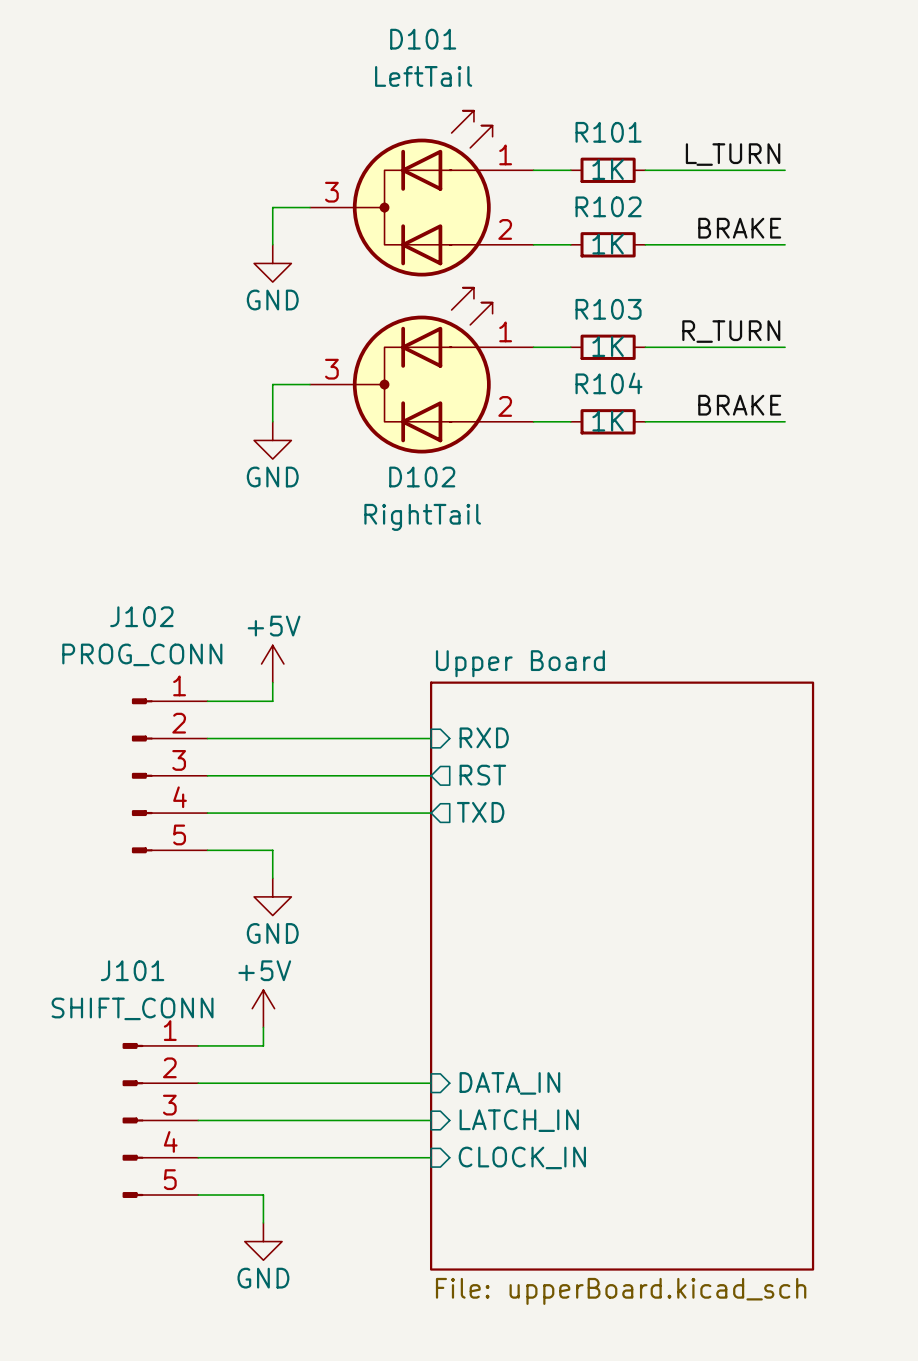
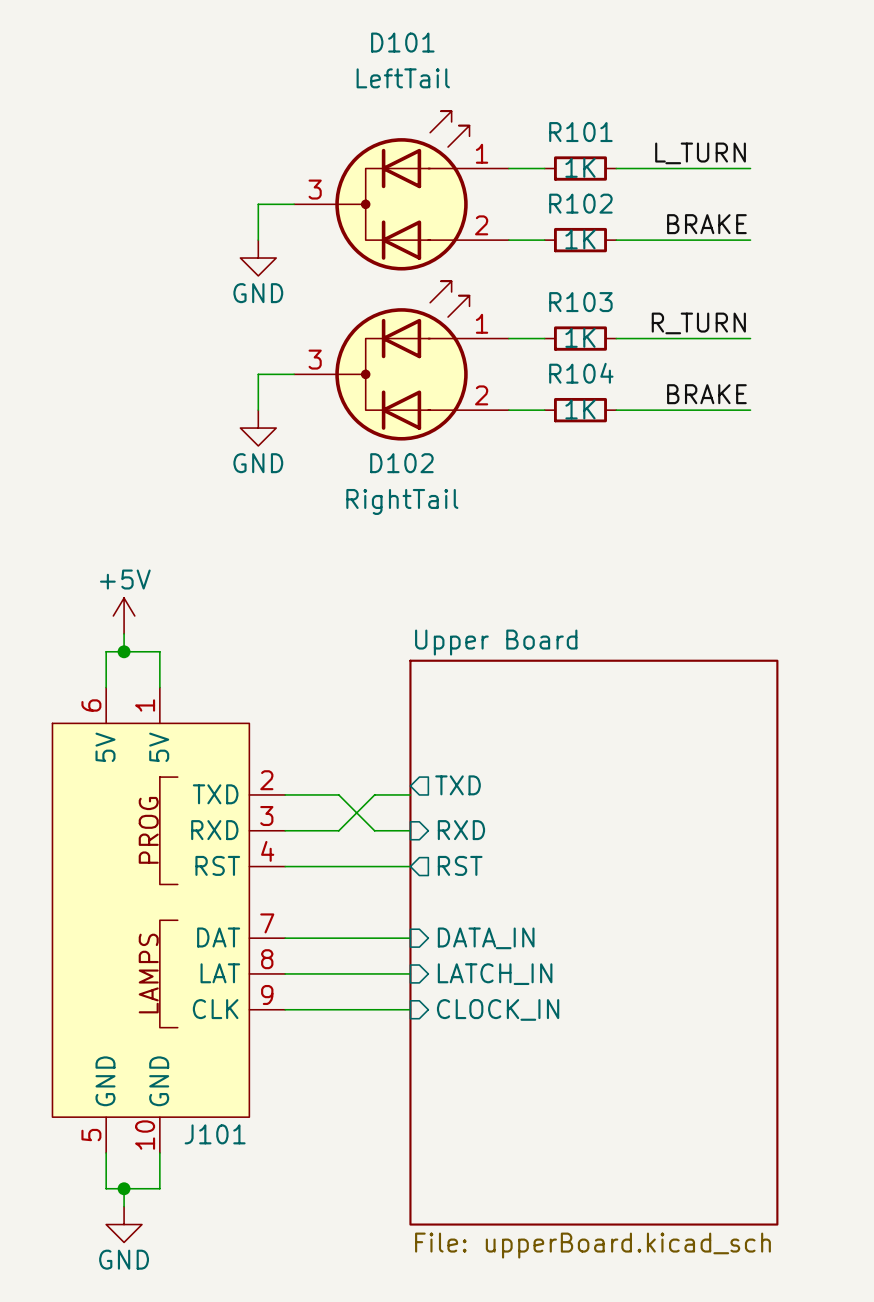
wire: none -> (124, 633) (124, 651)
power symbol position: +5V (272, 664) -> +5V (124, 615)
junction: none -> (124, 651)
wire: (272, 682) (272, 701) (207, 701) -> none
wire: none -> (106, 687) (106, 651) (159, 651) (159, 687)
sheet pin position: RXD (484, 737) -> RXD (461, 830)
wire: (207, 738) (431, 738) -> none
J102: PROG_CONN (169, 775) -> none
wire: (207, 775) (431, 775) -> none
sheet pin position: RST (482, 775) -> RST (460, 865)
wire: (207, 813) (431, 813) -> none
wire: none -> (285, 794) (338, 794) (374, 830) (410, 830)
wire: none -> (410, 794) (374, 794) (338, 830) (285, 830)
wire: (207, 850) (272, 850) (272, 878) -> none
power symbol: GND (272, 896) -> none
wire: none -> (285, 866) (410, 866)
J101 name position: J101 (132, 970) -> J101 (215, 1134)
wire: none -> (285, 938) (410, 938)
J101 value: SHIFT_CONN (132, 1008) -> none
power symbol: +5V (263, 1008) -> none
wire: none -> (285, 973) (410, 973)
J101 symbol: [122, 1042, 199, 1198] -> [52, 687, 286, 1153]
wire: none -> (285, 1009) (410, 1009)
wire: (198, 1083) (431, 1083) -> none
sheet pin position: DATA_IN (509, 1083) -> DATA_IN (486, 938)
wire: (198, 1120) (431, 1120) -> none
sheet pin position: LATCH_IN (519, 1120) -> LATCH_IN (495, 974)
wire: (198, 1157) (431, 1157) -> none
sheet pin position: CLOCK_IN (522, 1157) -> CLOCK_IN (498, 1009)
wire: none -> (106, 1152) (106, 1188) (159, 1188) (159, 1152)
wire: (198, 1195) (263, 1195) (263, 1222) -> none
wire: none -> (124, 1188) (124, 1206)
junction: none -> (124, 1188)
power symbol position: GND (263, 1241) -> GND (124, 1224)

